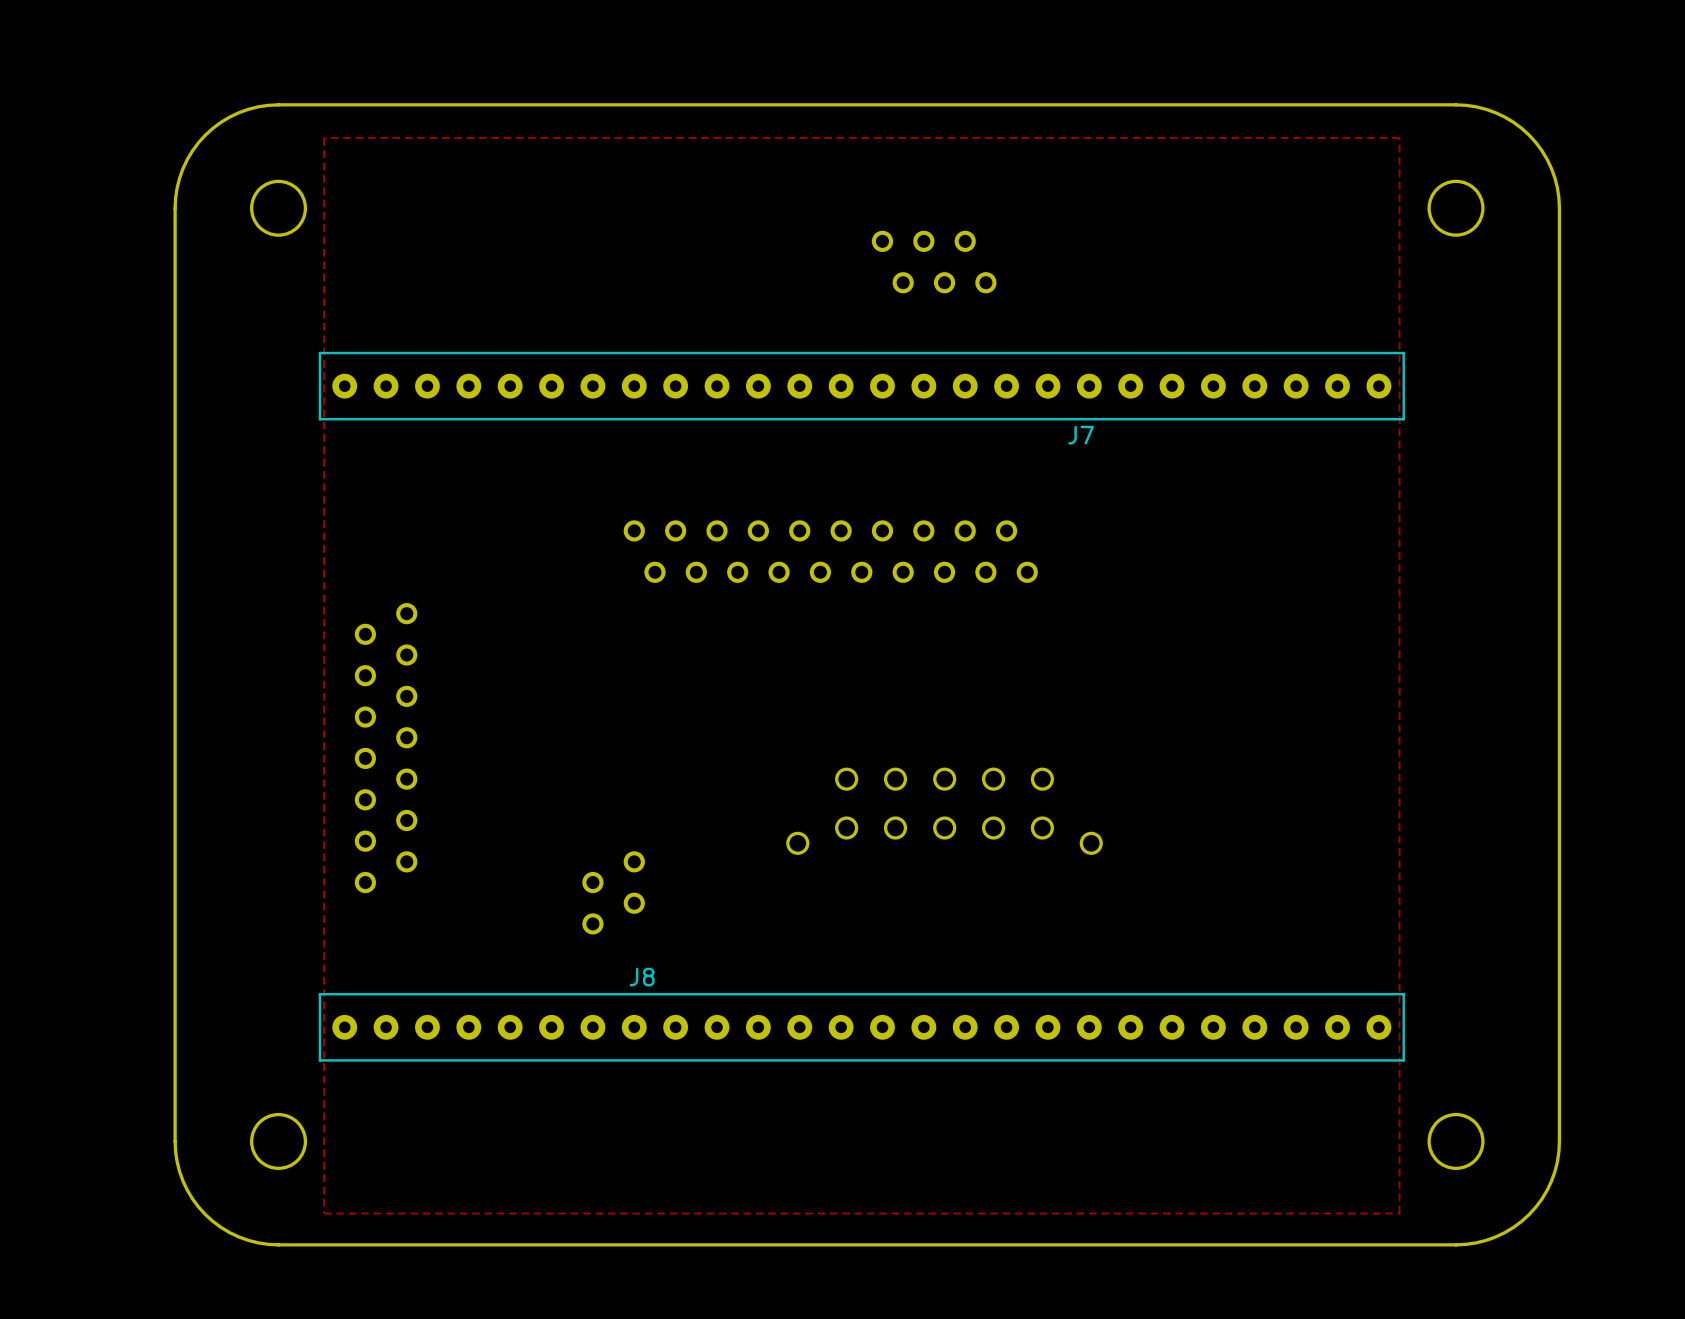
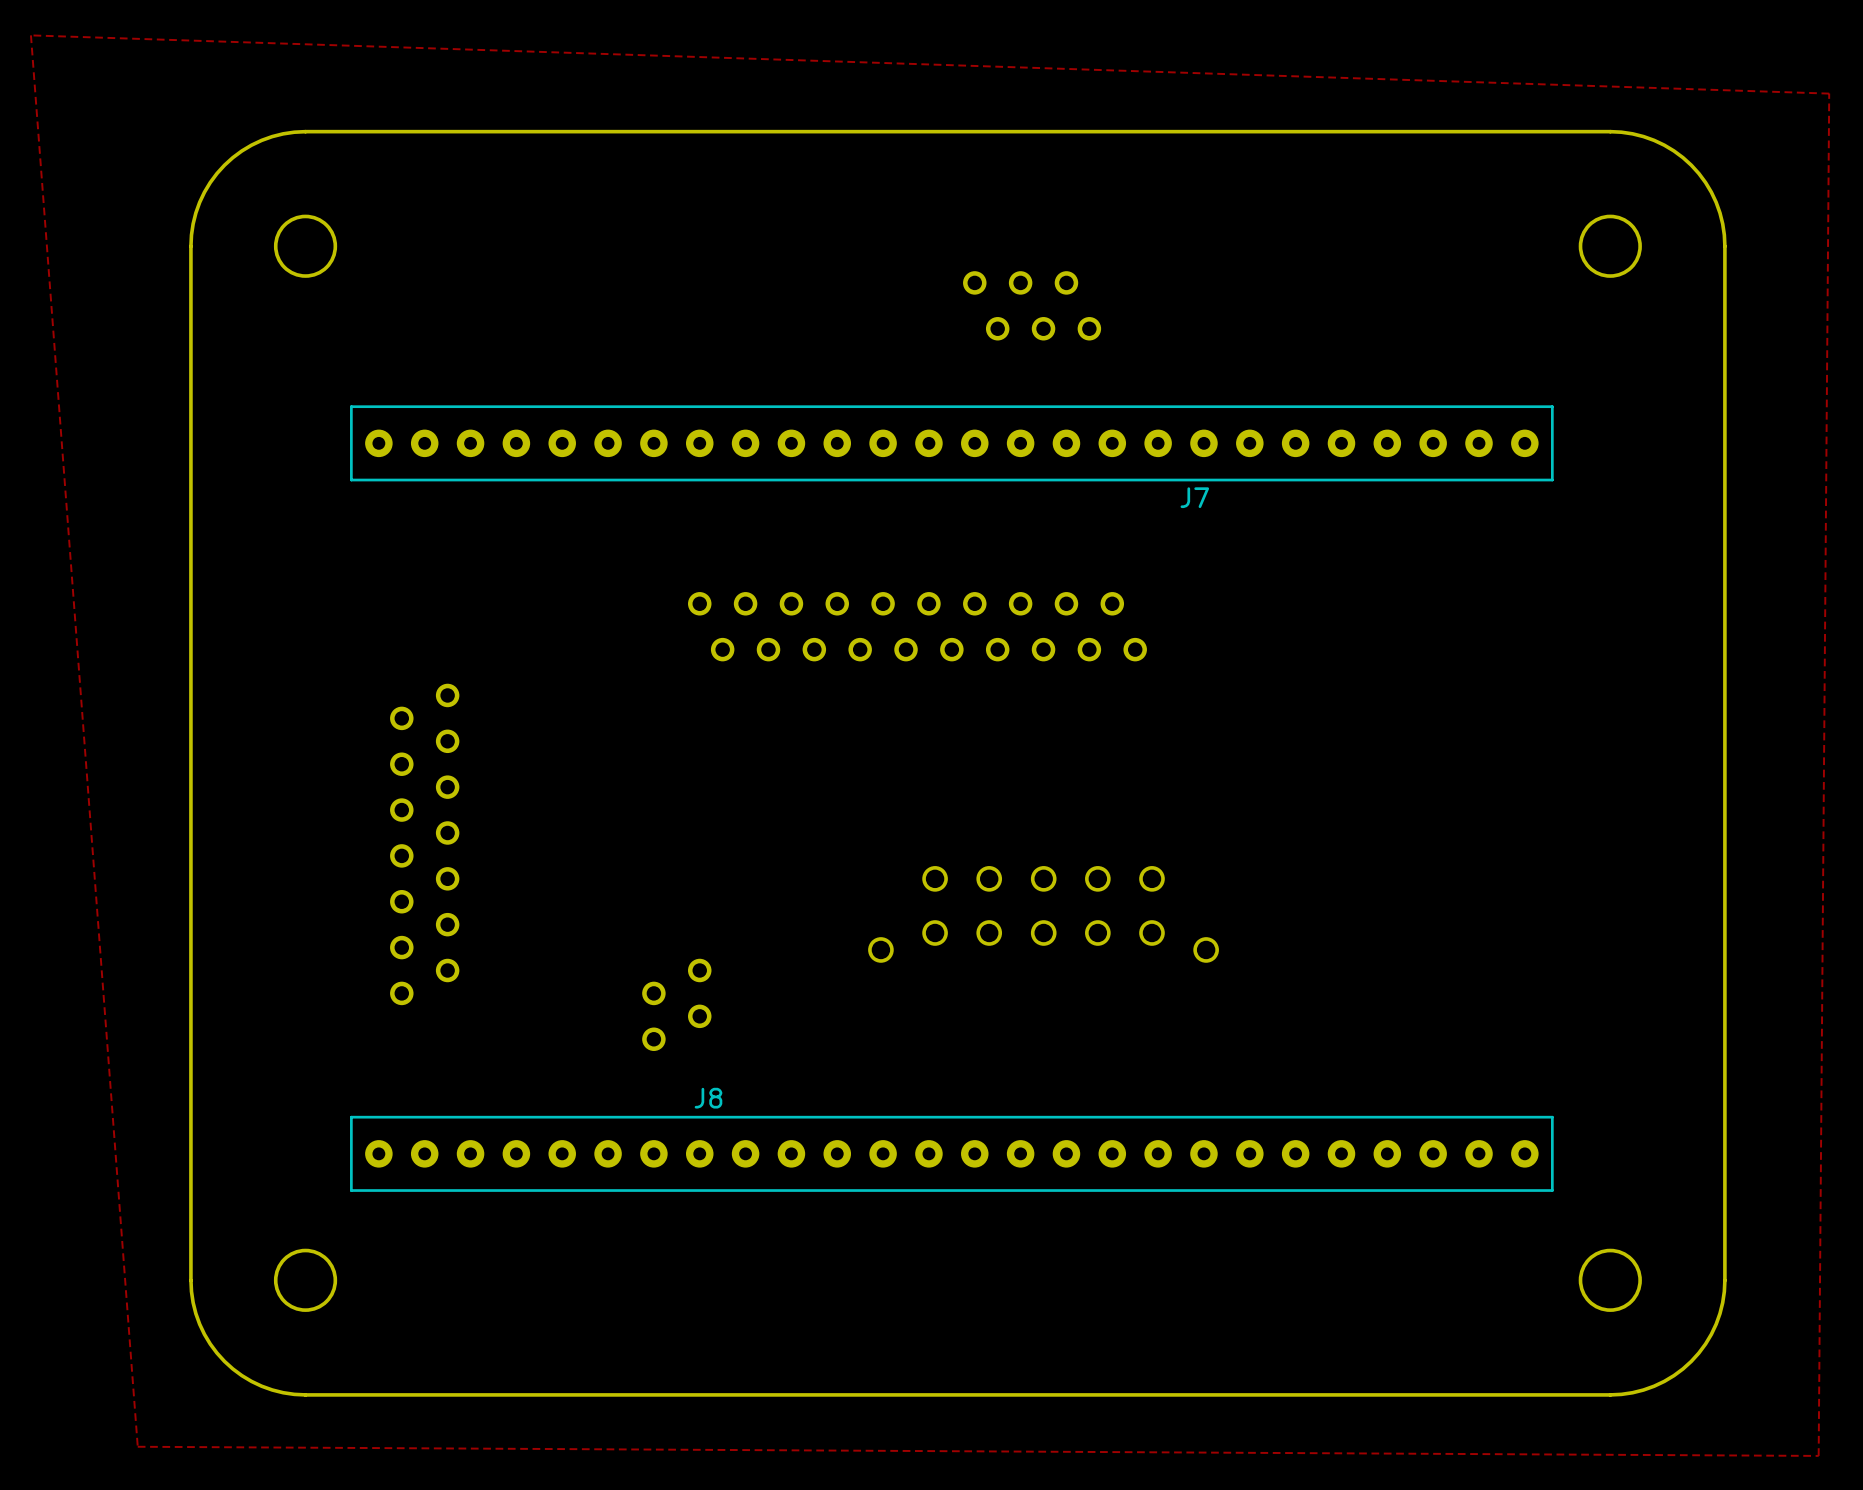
zone outline: (324, 137) (324, 1213) (1399, 1213) (1399, 137) (324, 137) -> (30, 35) (137, 1446) (1818, 1455) (1829, 93) (30, 35)

